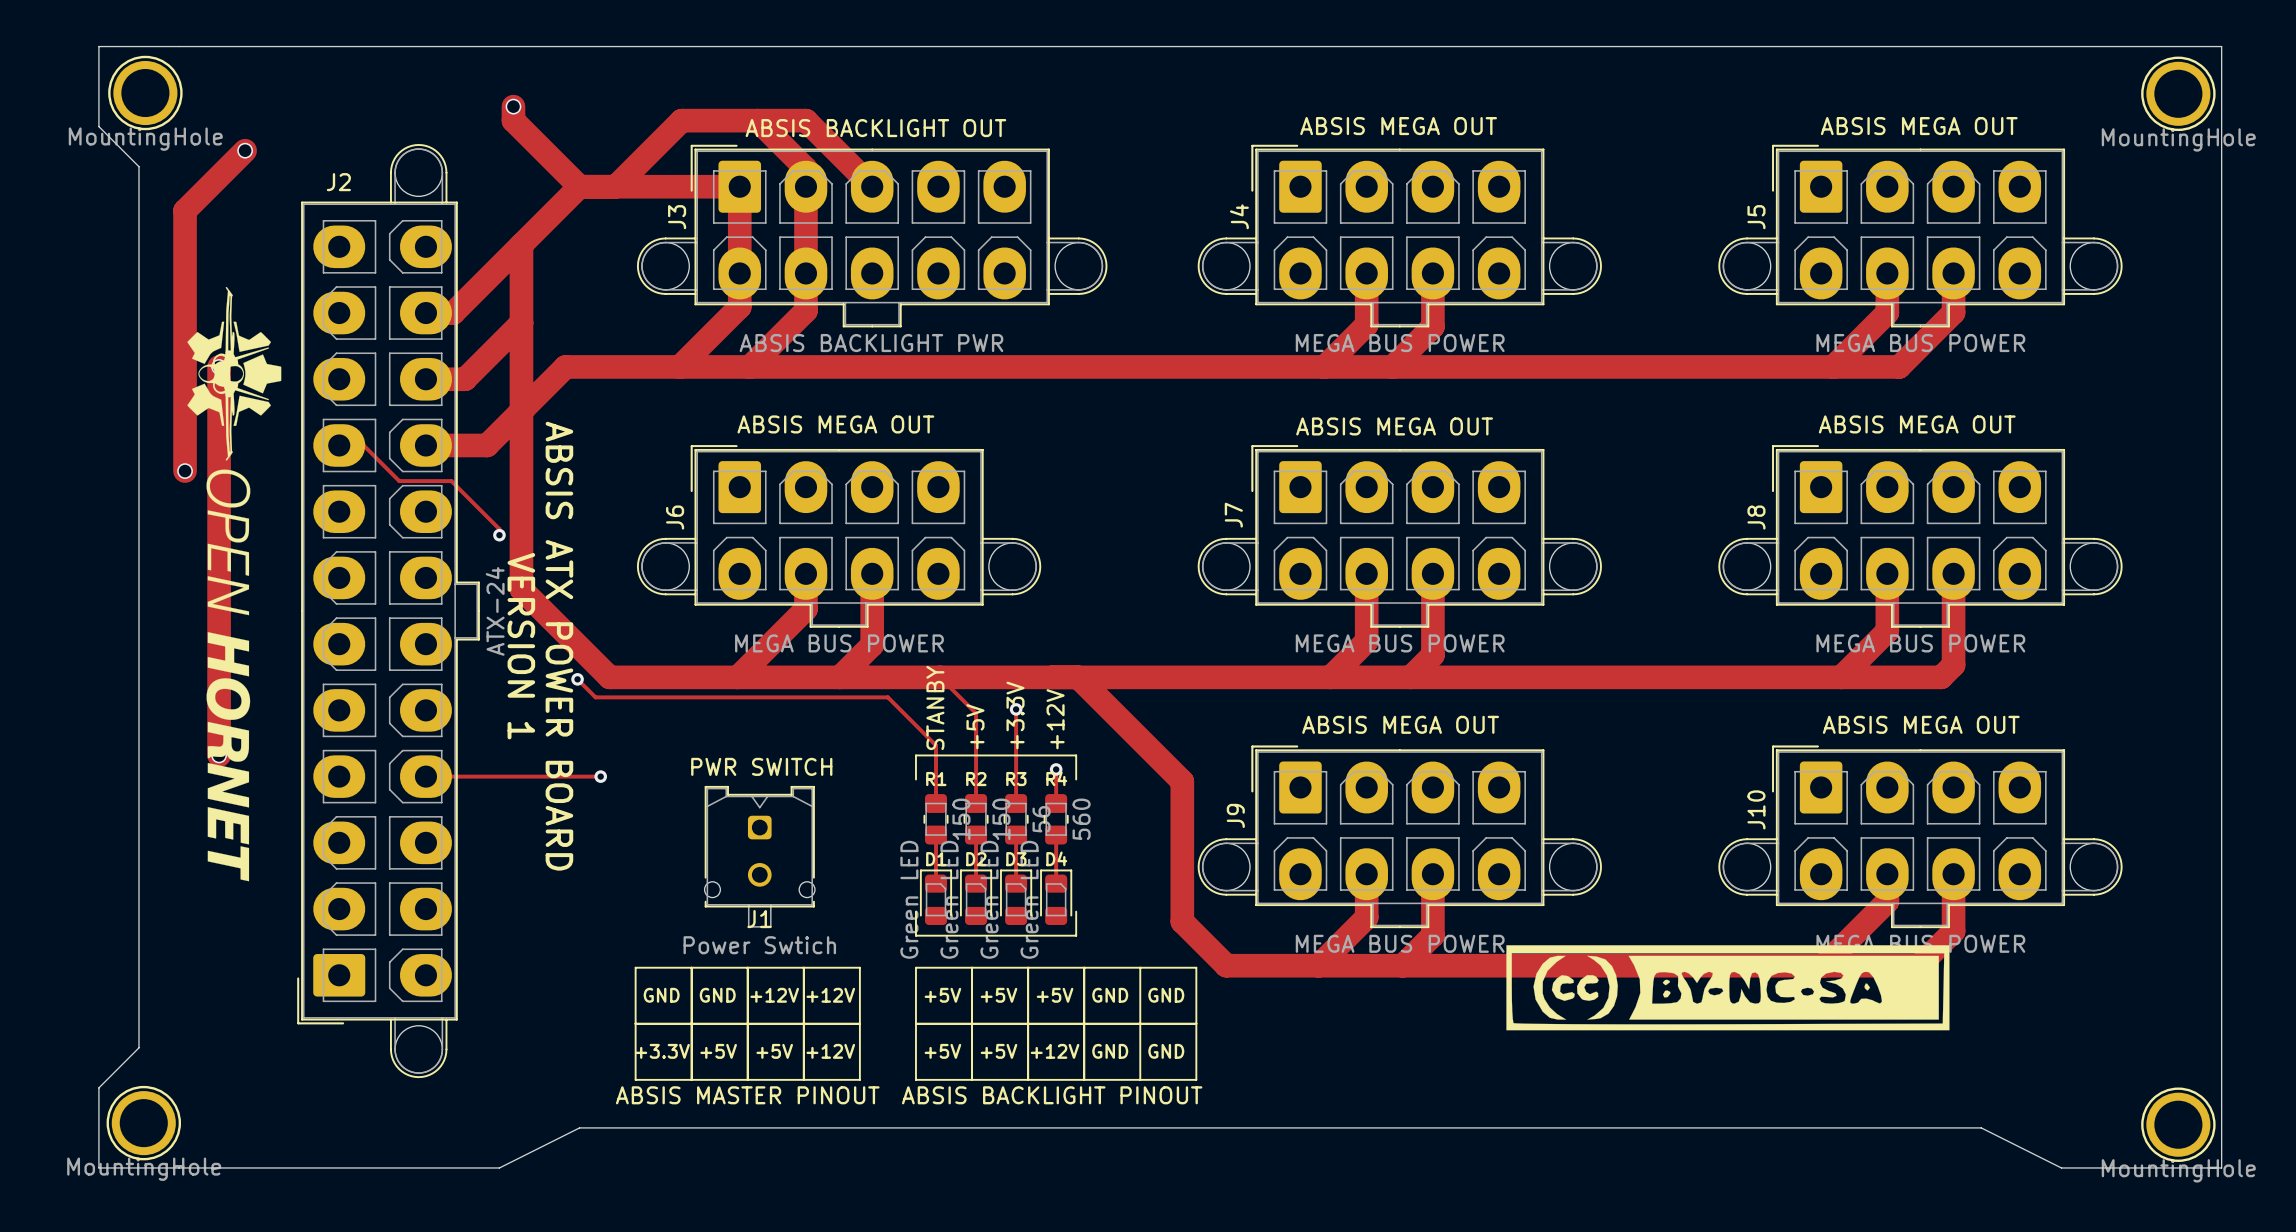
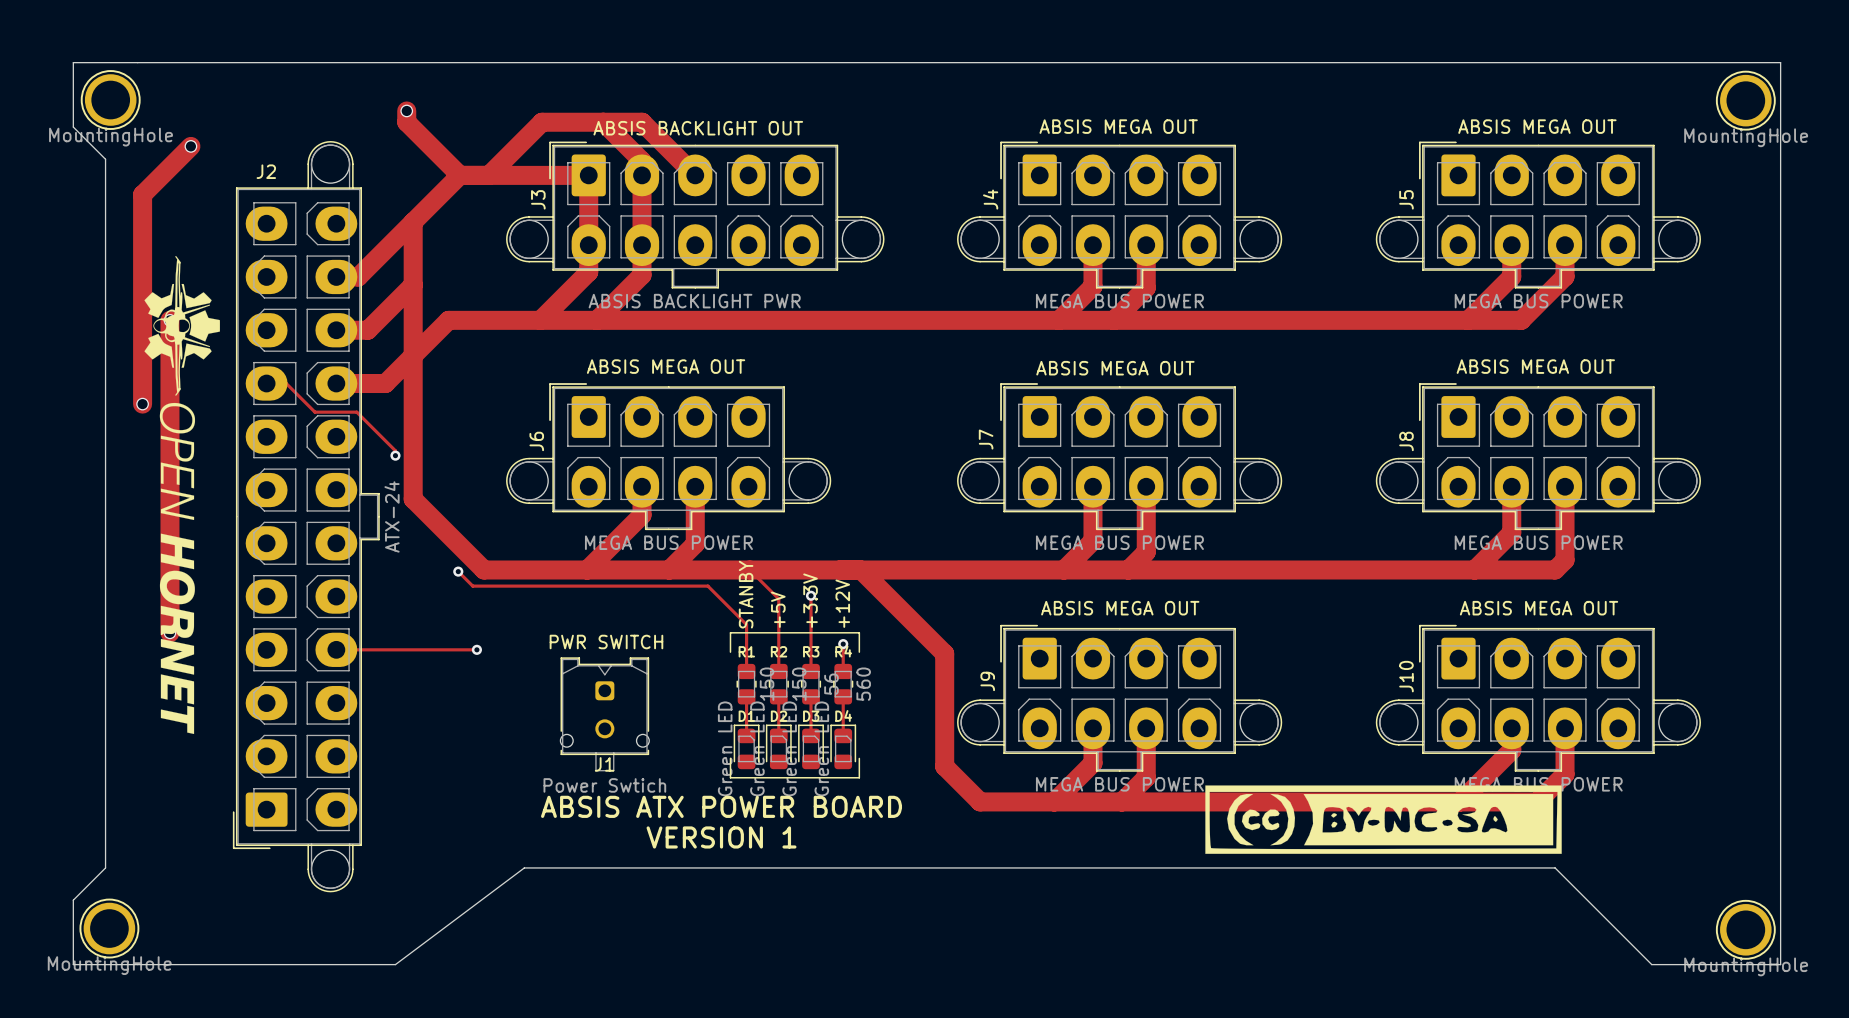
text: VERSION 1 (521, 646) -> none
text: ABSIS ATX POWER BOARD (559, 646) -> none
line: (635, 967) (859, 967) (859, 1079) (635, 1079) (635, 967) -> none
line: (691, 967) (691, 1079) -> none
line: (747, 967) (747, 1079) -> none
line: (803, 967) (803, 1079) -> none
line: (915, 967) (1196, 967) (1196, 1079) (915, 1079) (915, 967) -> none
line: (972, 967) (972, 1079) -> none
line: (1028, 967) (1028, 1079) -> none
line: (1084, 967) (1084, 1079) -> none
line: (1140, 967) (1140, 1079) -> none
text: none -> ABSIS ATX POWER BOARD (721, 806)
text: GND (661, 995) -> none
text: GND (717, 995) -> none
text: +12V (774, 995) -> none
text: +12V (830, 995) -> none
text: +5V (942, 995) -> none
text: +5V (998, 995) -> none
text: +5V (1055, 995) -> none
text: GND (1110, 995) -> none
text: GND (1166, 995) -> none
text: none -> VERSION 1 (721, 837)
line: (635, 1023) (859, 1023) -> none
line: (915, 1023) (1196, 1023) -> none
text: +3.3V (662, 1051) -> none
text: +5V (718, 1051) -> none
text: +5V (774, 1051) -> none
text: +12V (830, 1051) -> none
text: +5V (942, 1051) -> none
text: +5V (998, 1051) -> none
text: +12V (1055, 1051) -> none
text: GND (1110, 1051) -> none
text: GND (1166, 1051) -> none
text: ABSIS MASTER PINOUT (747, 1095) -> none
text: ABSIS BACKLIGHT PINOUT (1052, 1095) -> none
board edge: (499, 1167) (579, 1127) (1981, 1127) (2061, 1167) -> (395, 964) (524, 867) (1555, 867) (1651, 964)

